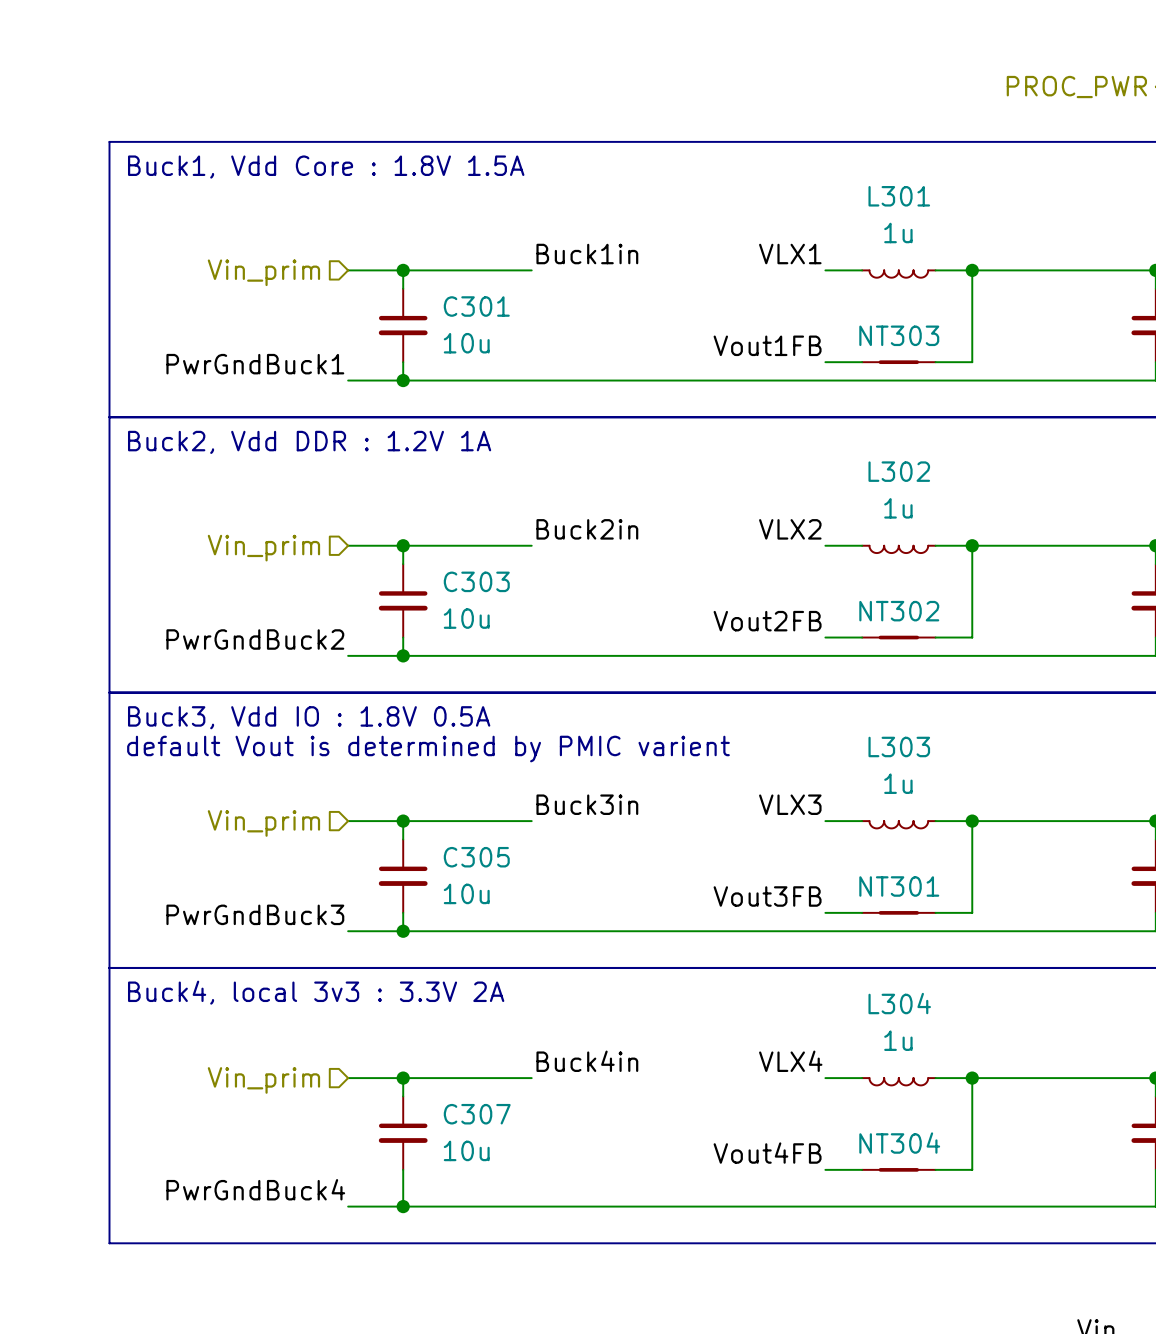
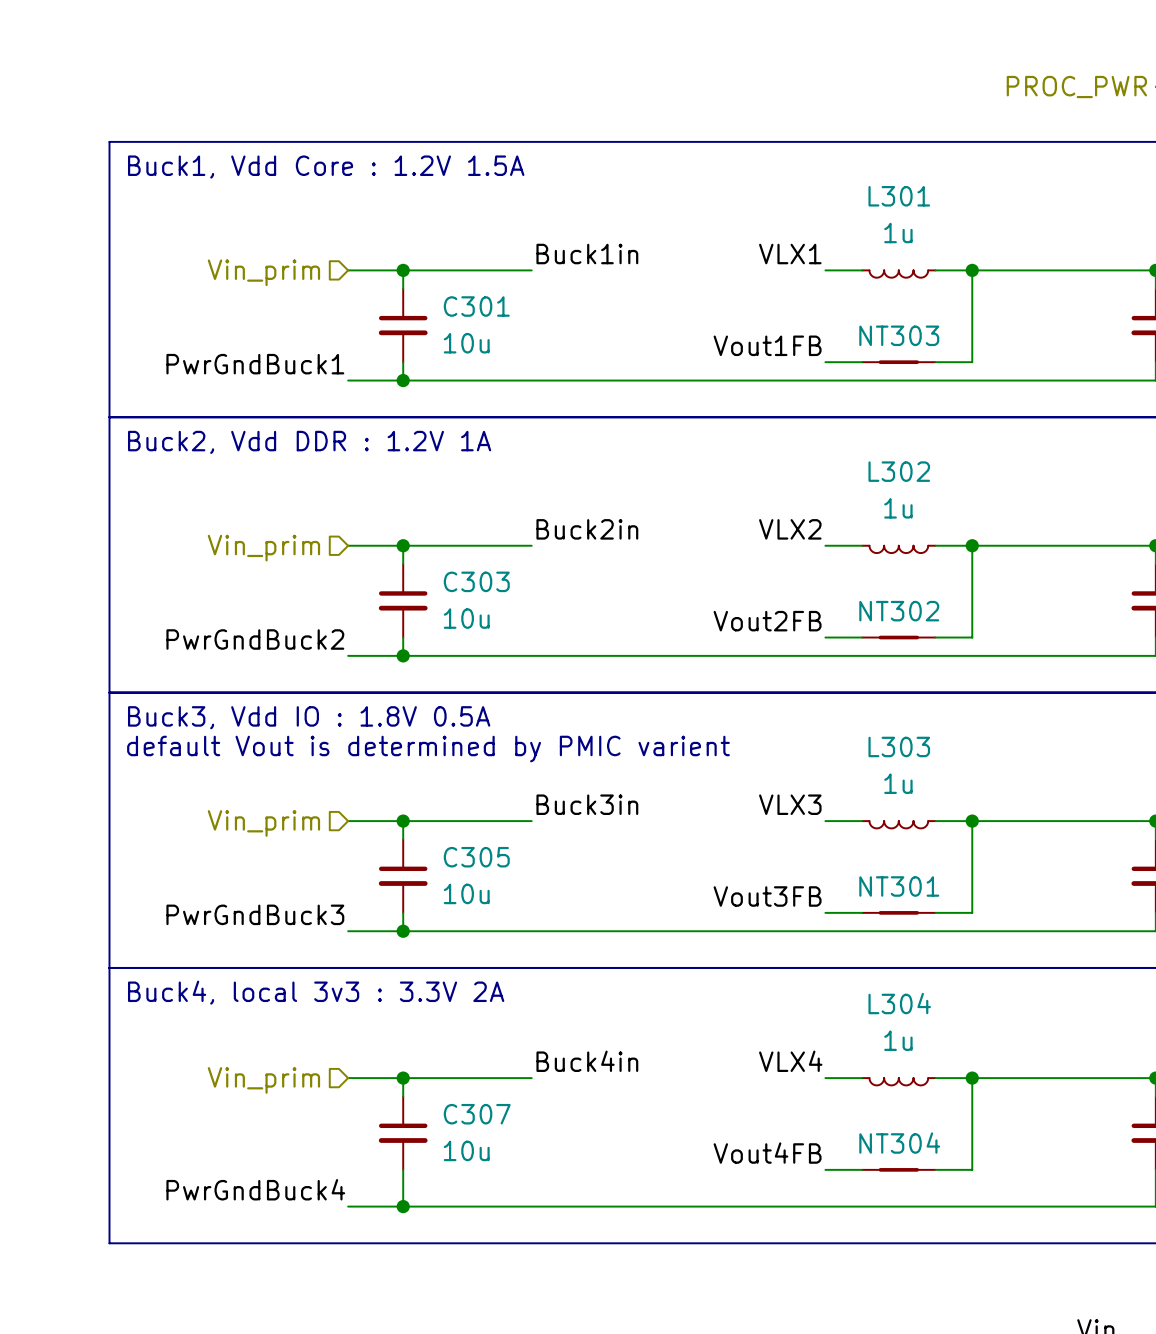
text: Buck1, Vdd Core : 1.8V 1.5A (326, 167) -> Buck1, Vdd Core : 1.2V 1.5A (326, 167)

